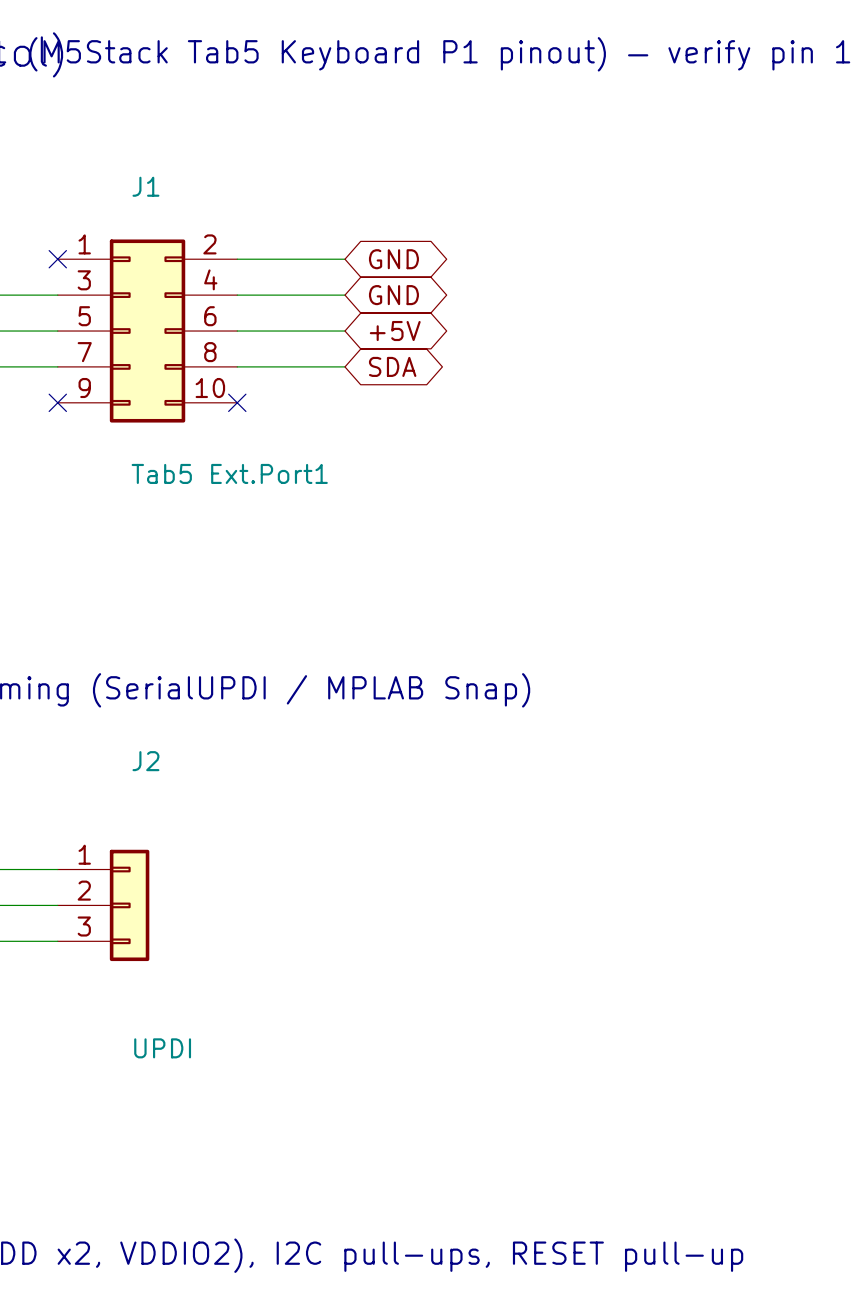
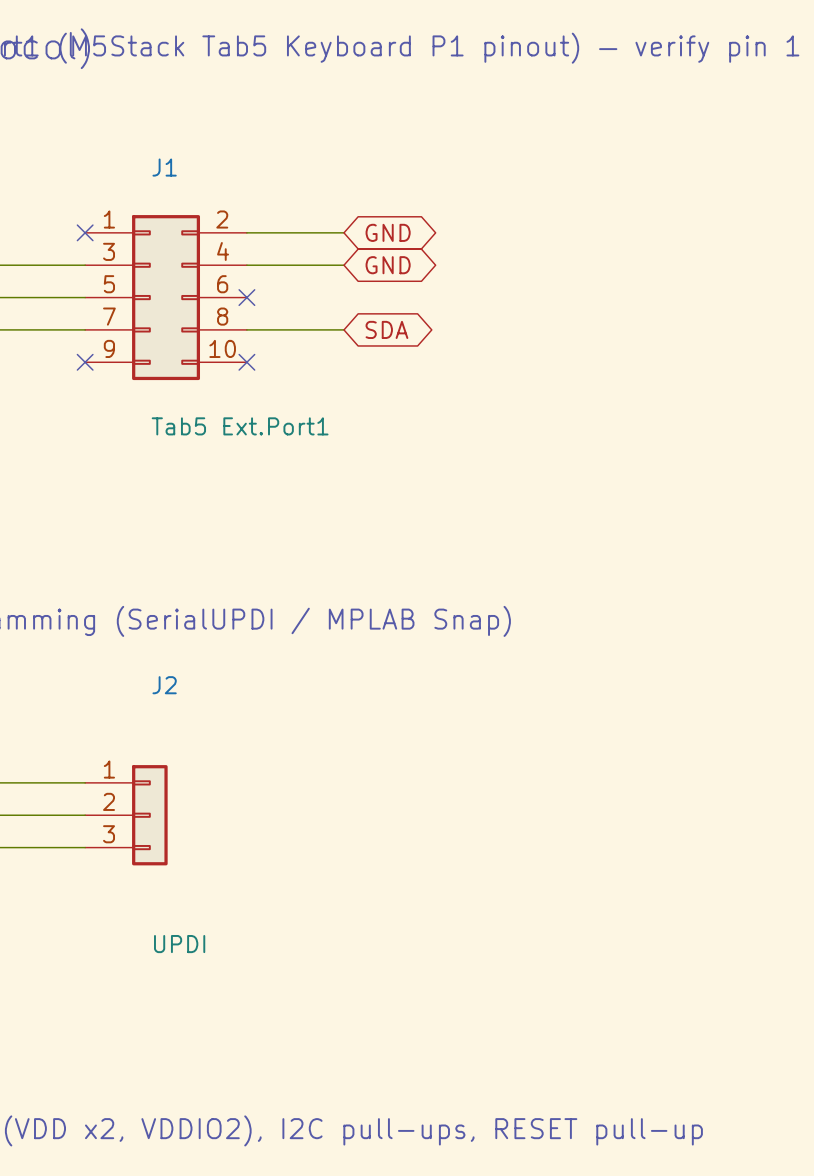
wire: (237, 331) (344, 331) -> none
no-connect mark: none -> (246, 297)
global label: +5V (395, 331) -> none

